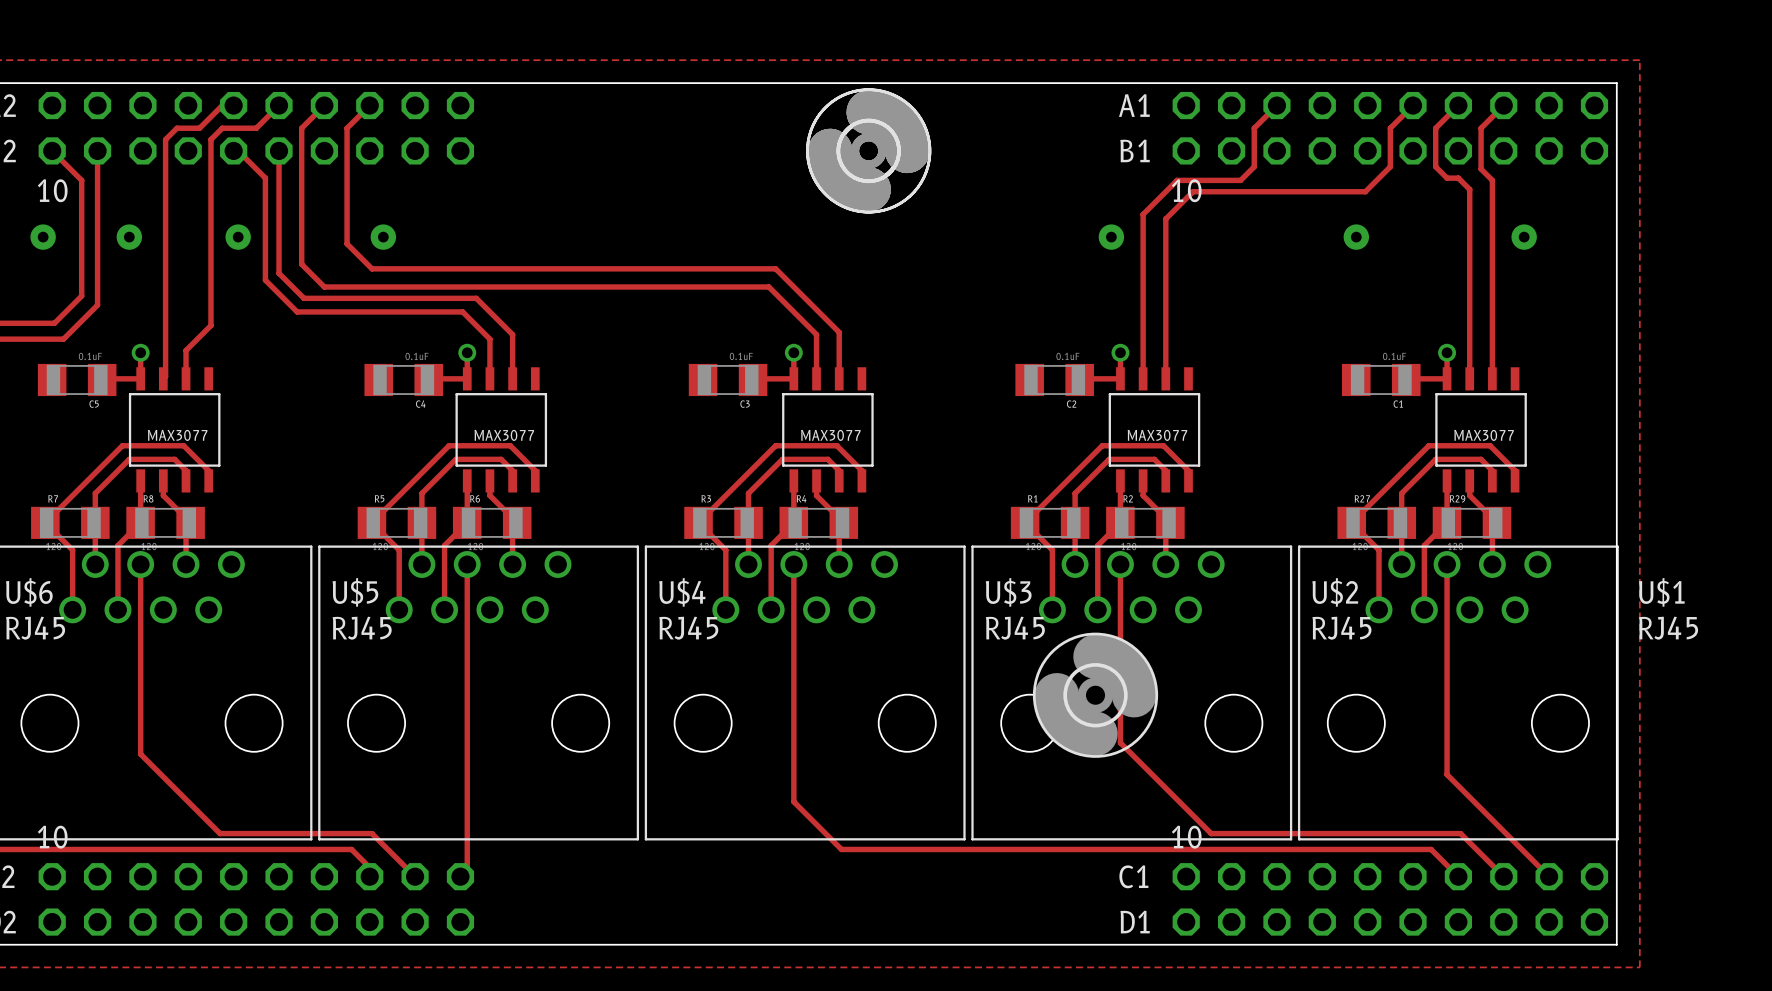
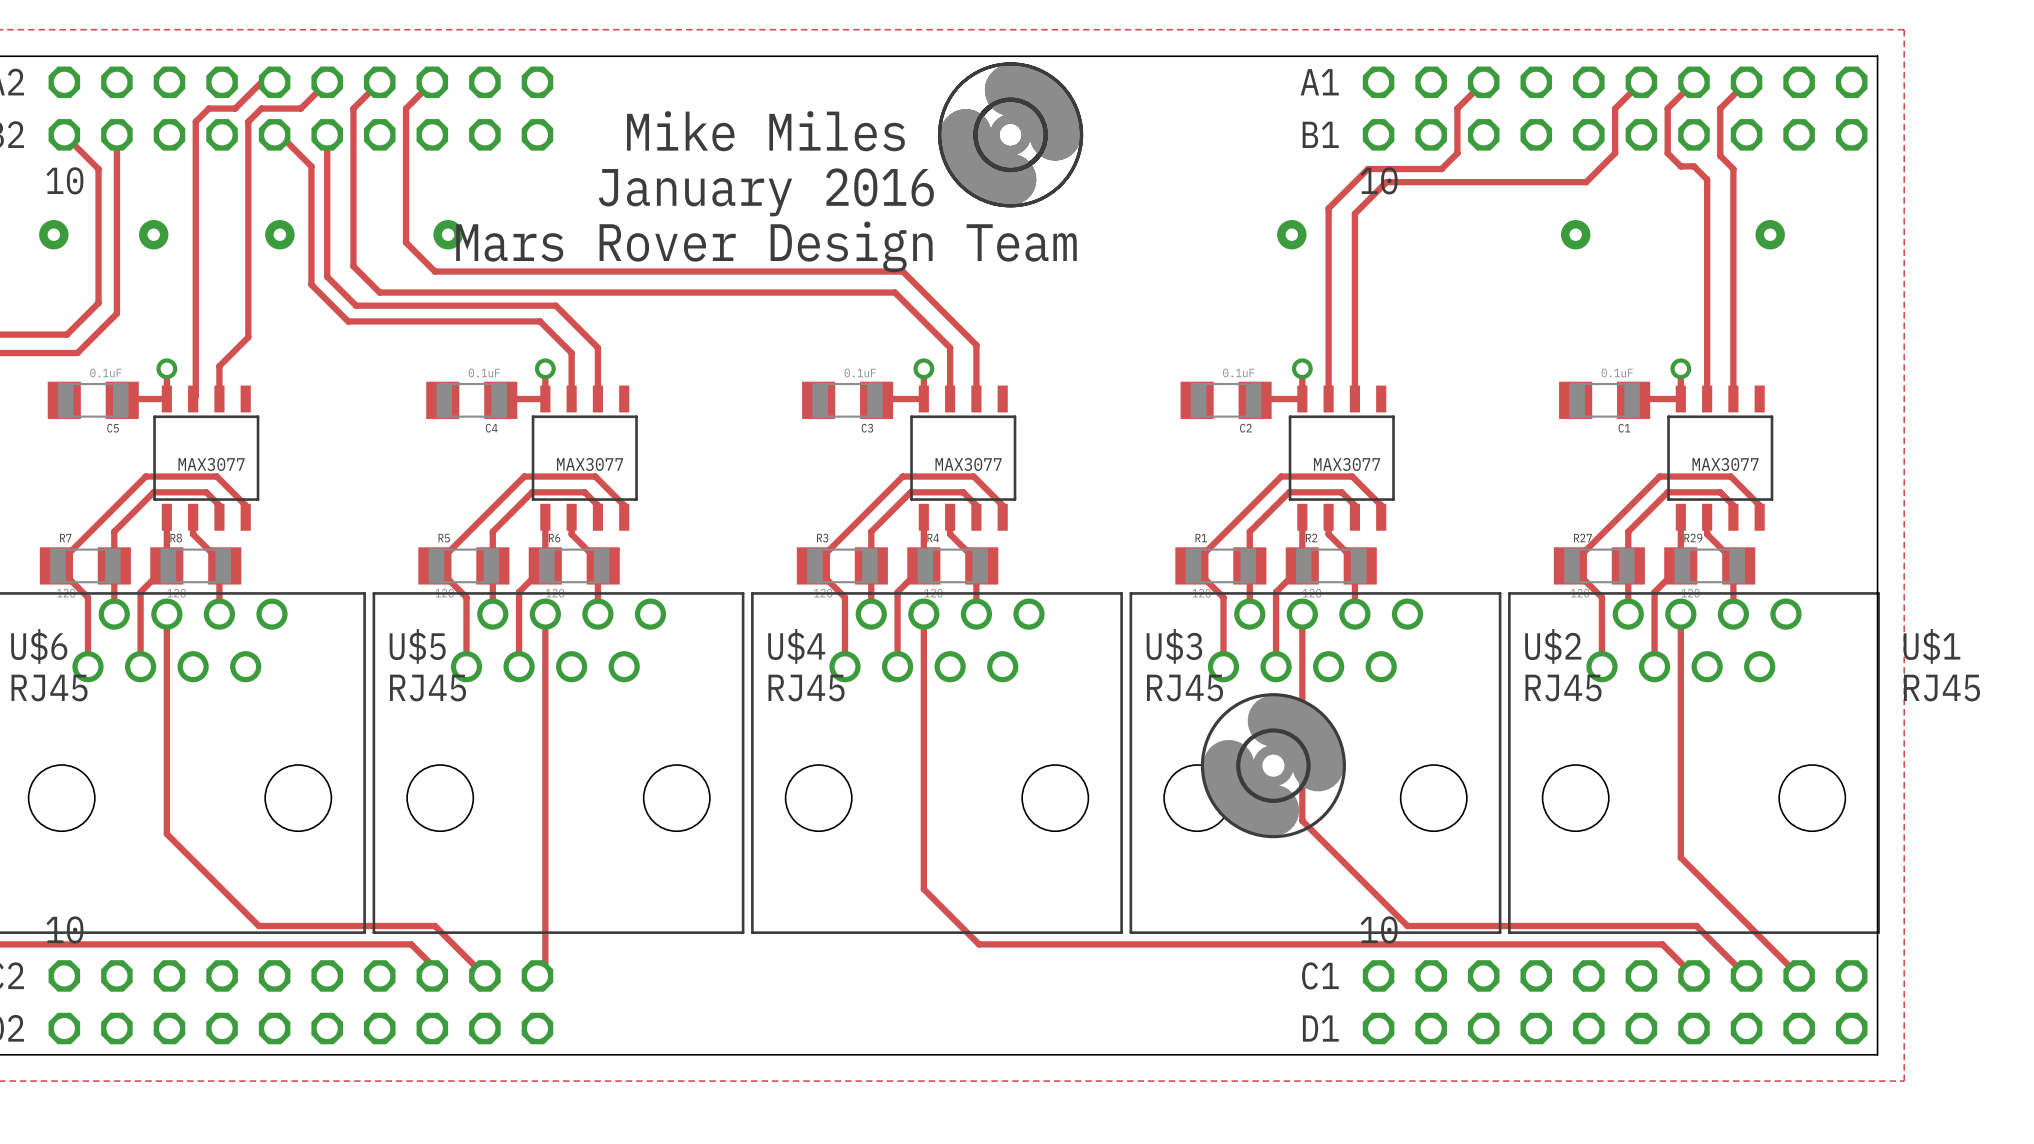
text: none -> Mike Miles (765, 131)
text: none -> January 2016 (766, 192)
text: none -> Mars Rover Design Team (766, 246)

